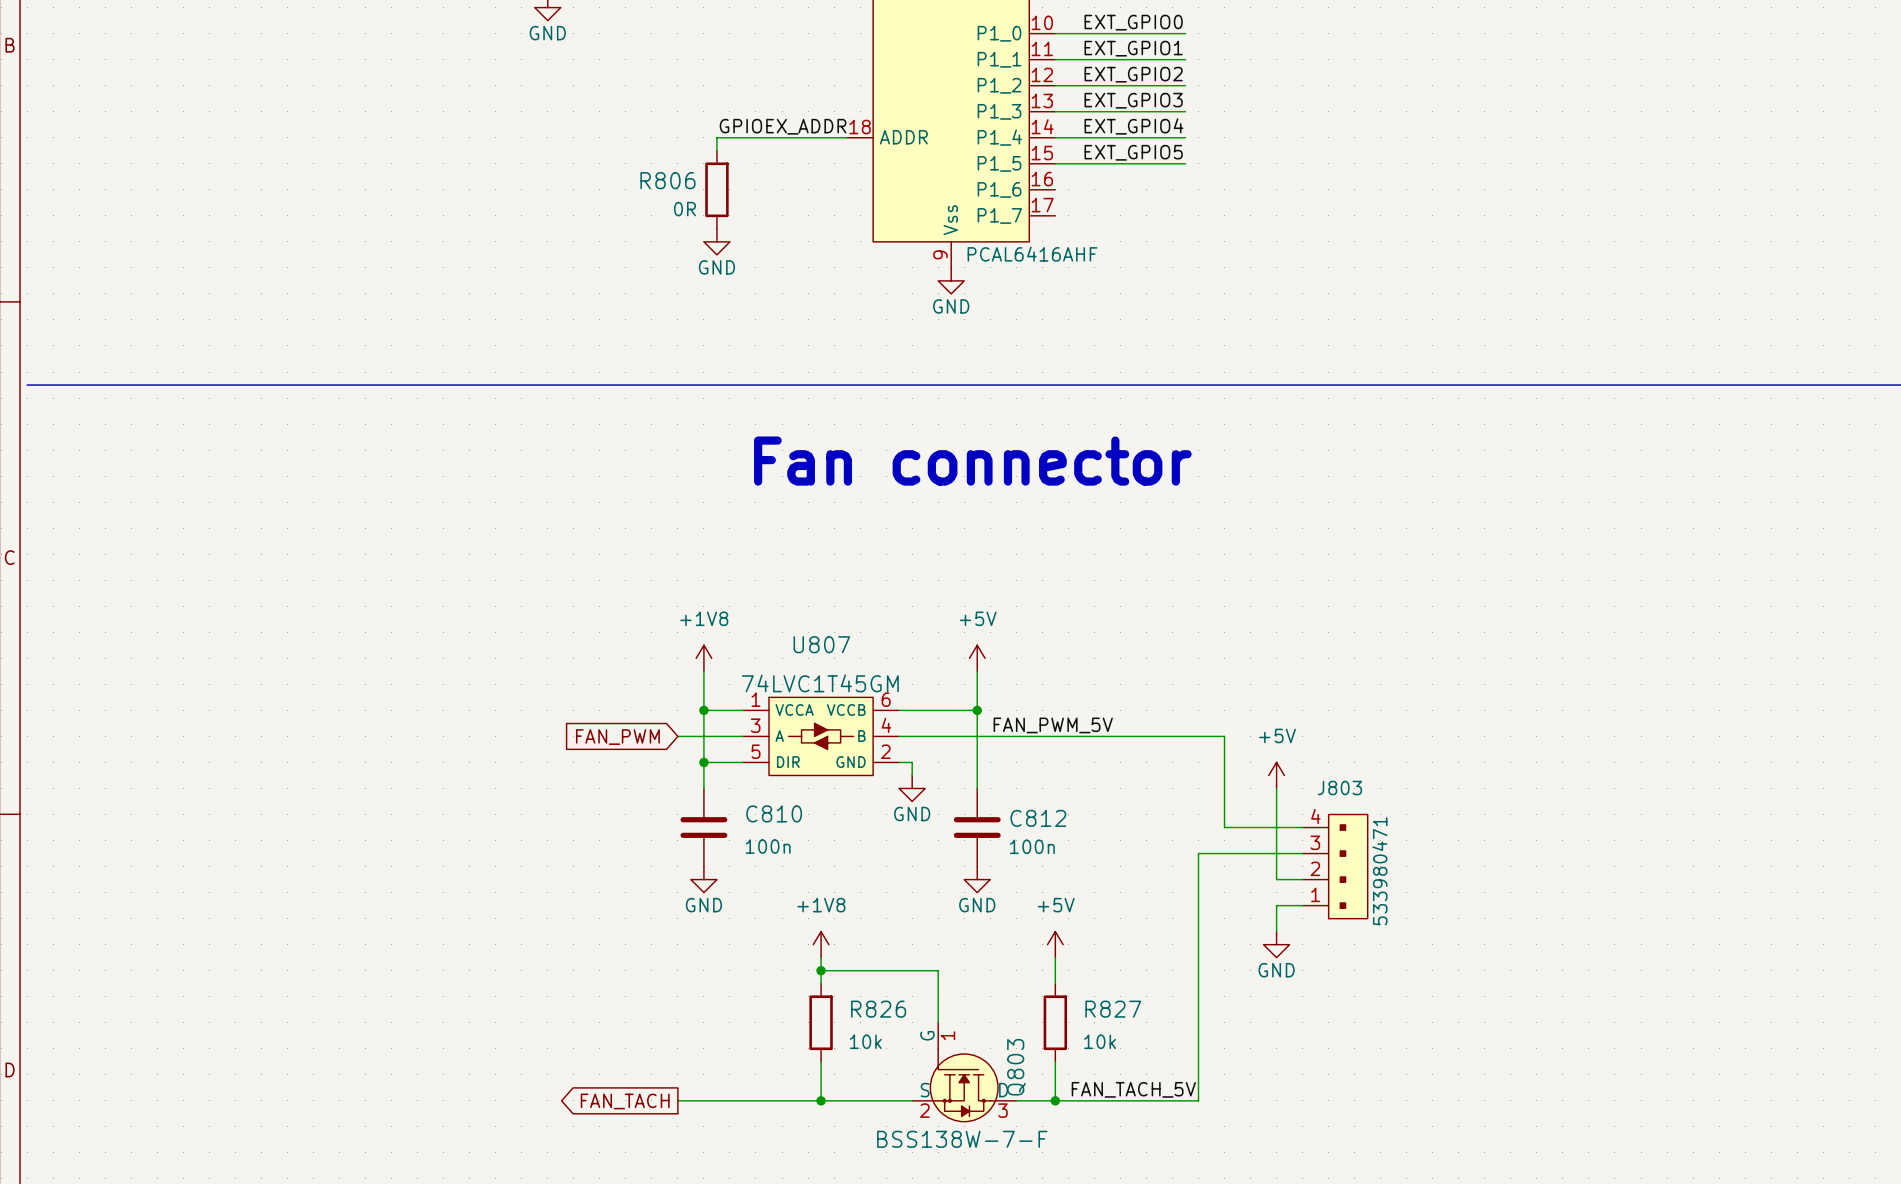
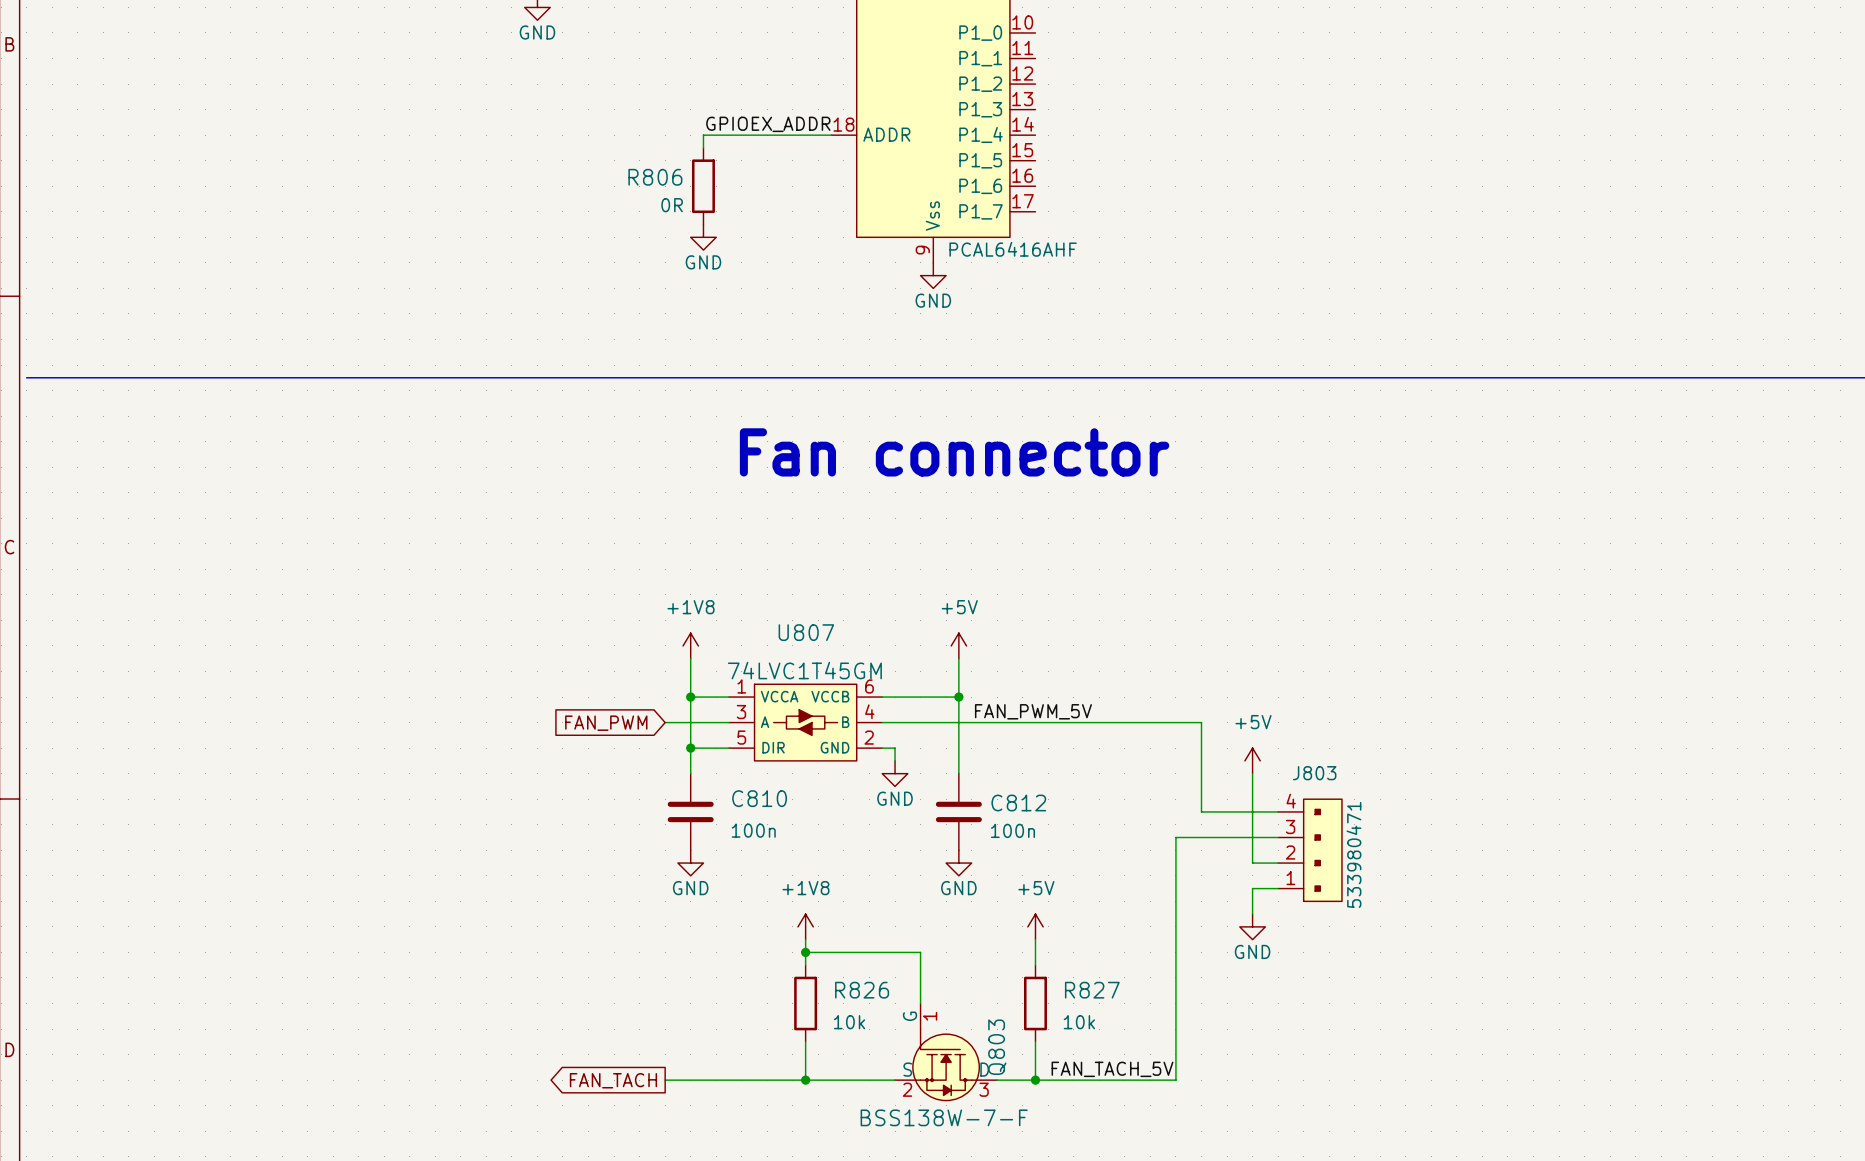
label: EXT_GPIO0 (1133, 22) -> none
wire: (1055, 33) (1185, 33) -> none
label: EXT_GPIO1 (1133, 48) -> none
wire: (1055, 59) (1185, 59) -> none
label: EXT_GPIO2 (1133, 74) -> none
wire: (1055, 85) (1185, 85) -> none
label: EXT_GPIO3 (1133, 100) -> none
wire: (1055, 111) (1185, 111) -> none
label: EXT_GPIO4 (1133, 126) -> none
wire: (1055, 137) (1185, 137) -> none
label: EXT_GPIO5 (1133, 152) -> none
wire: (1055, 163) (1185, 163) -> none

